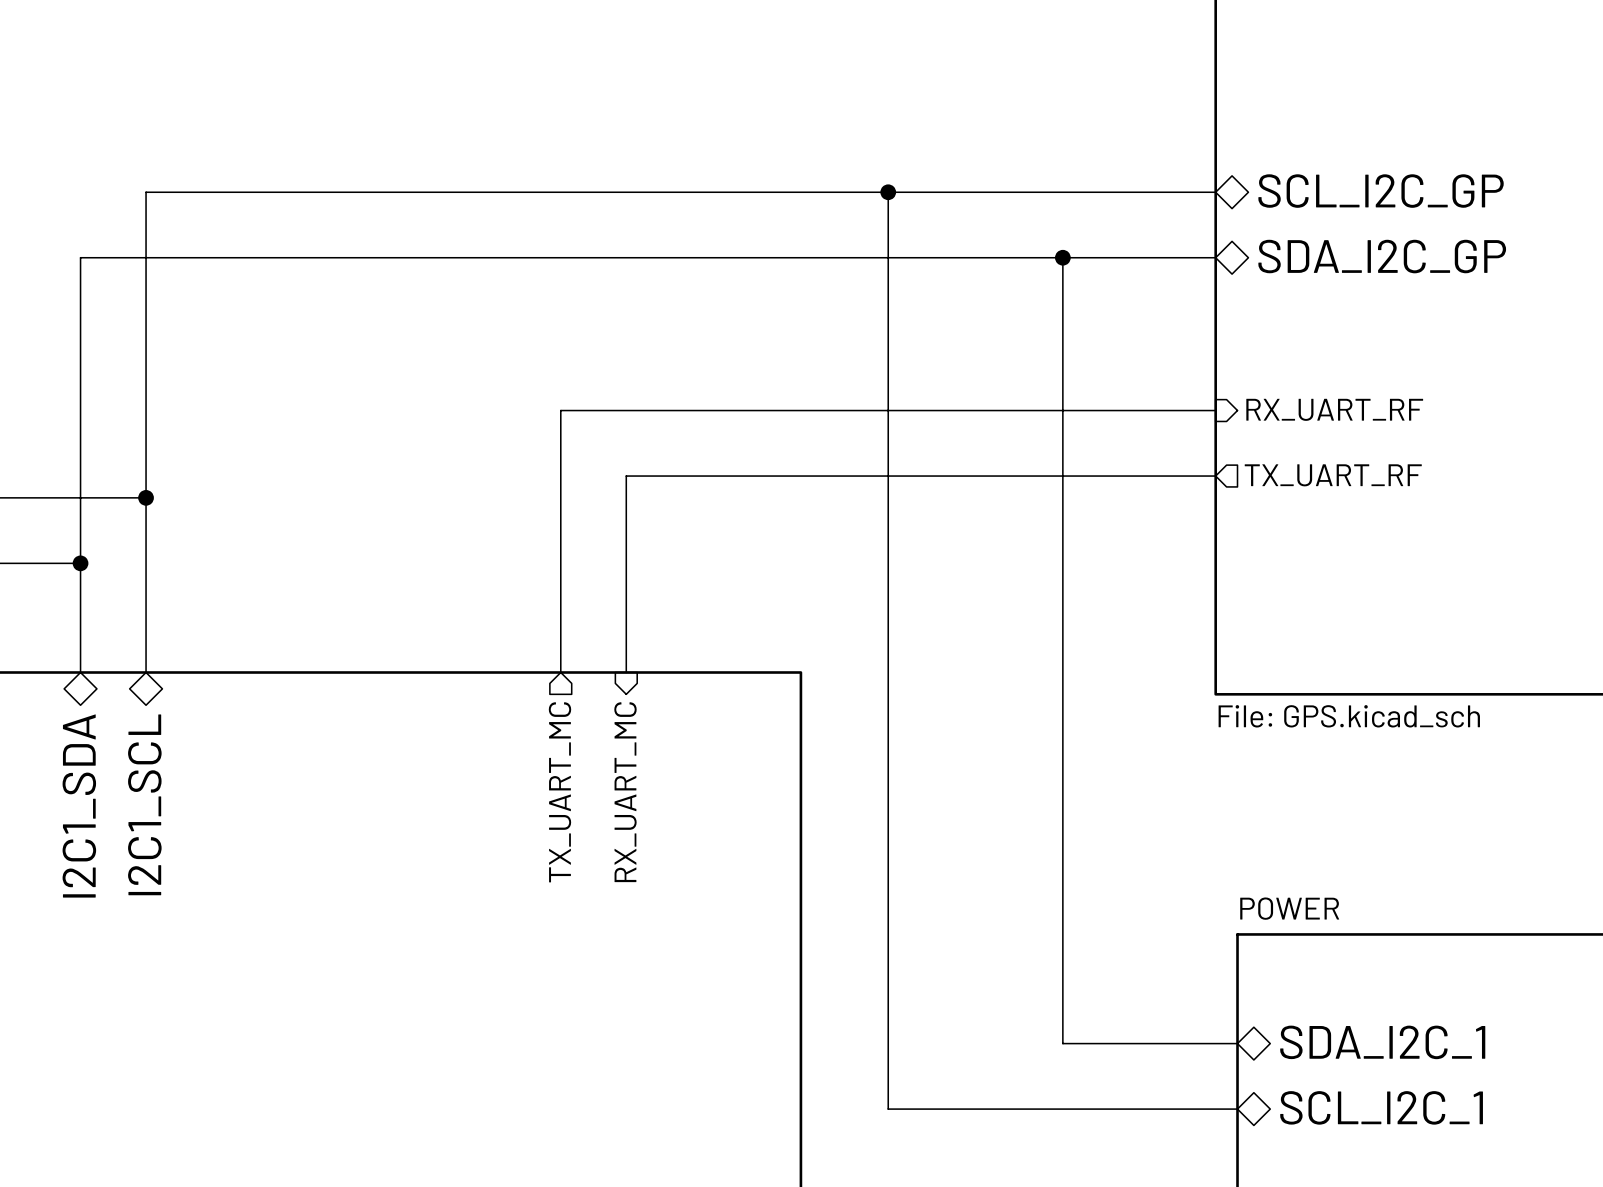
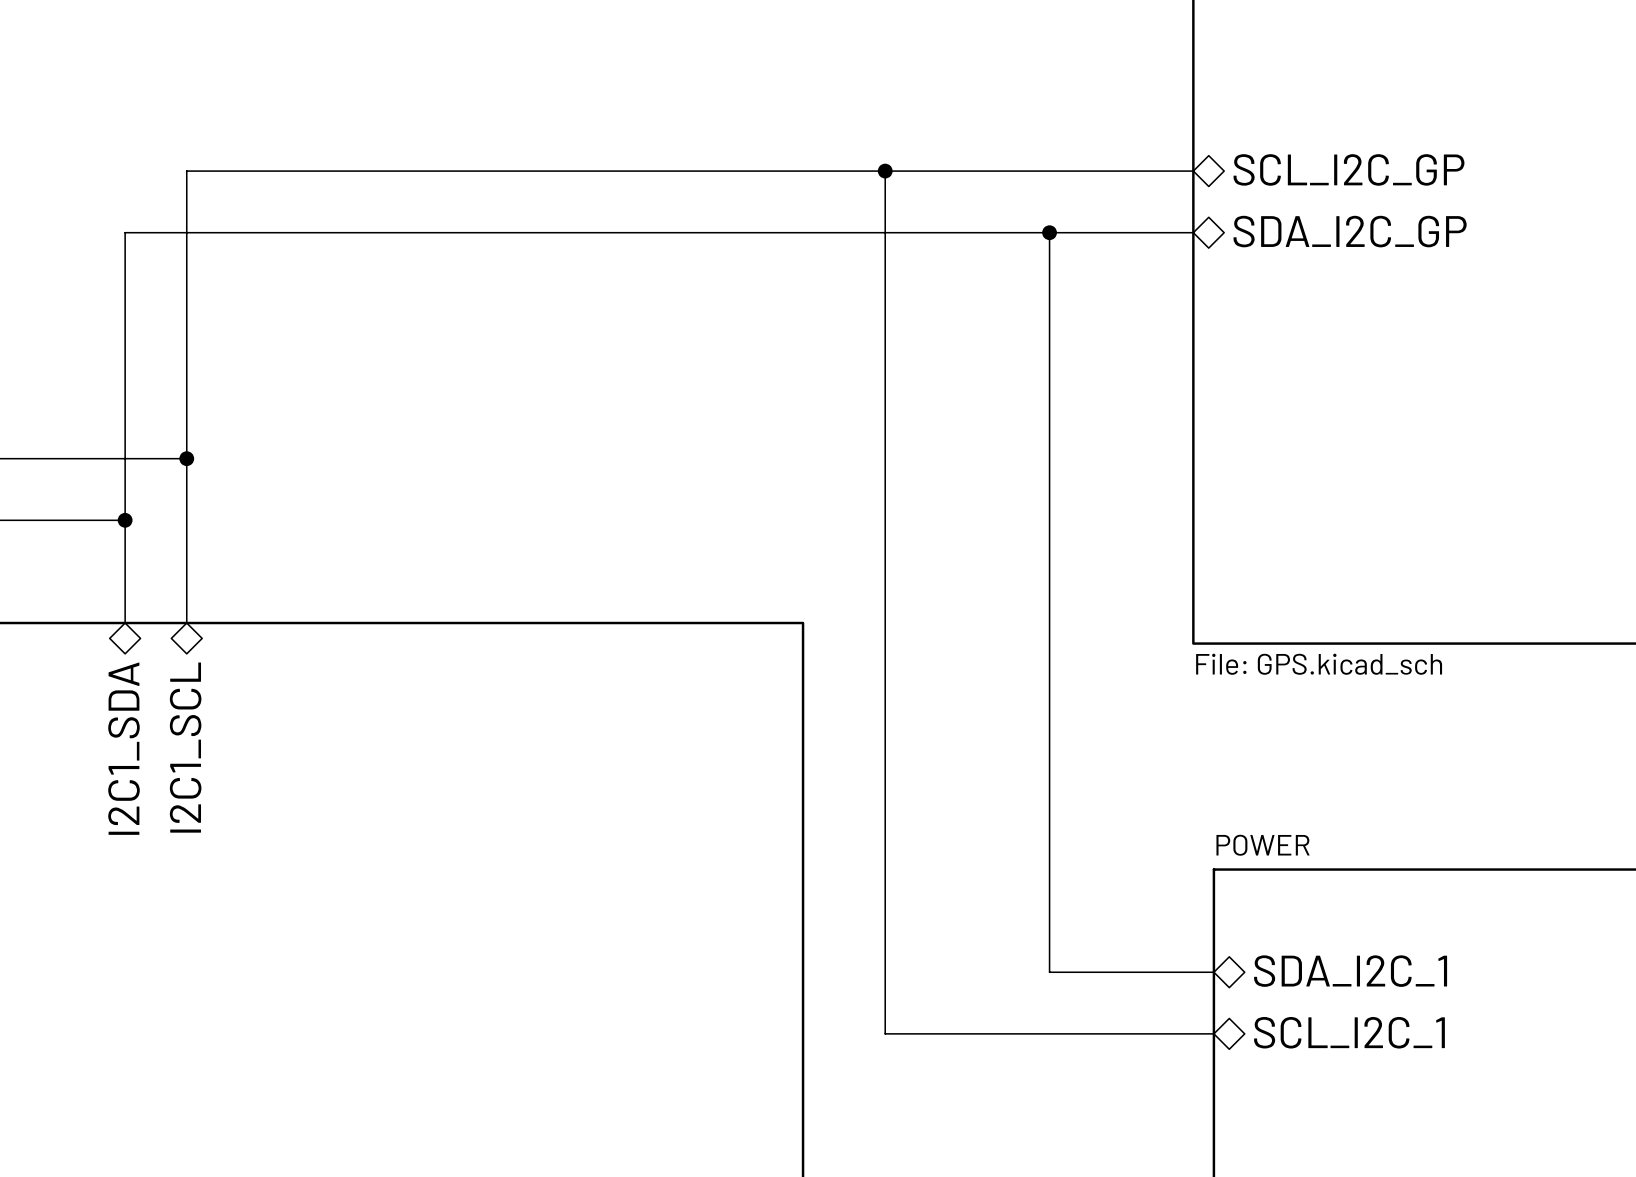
sheet pin: RX_UART_RF (1334, 409) -> none
wire: (1215, 410) (560, 410) (560, 672) -> none
sheet pin: TX_UART_RF (1333, 475) -> none
wire: (1215, 476) (626, 476) (626, 672) -> none
sheet pin: TX_UART_MC (559, 792) -> none
sheet pin: RX_UART_MC (625, 792) -> none

